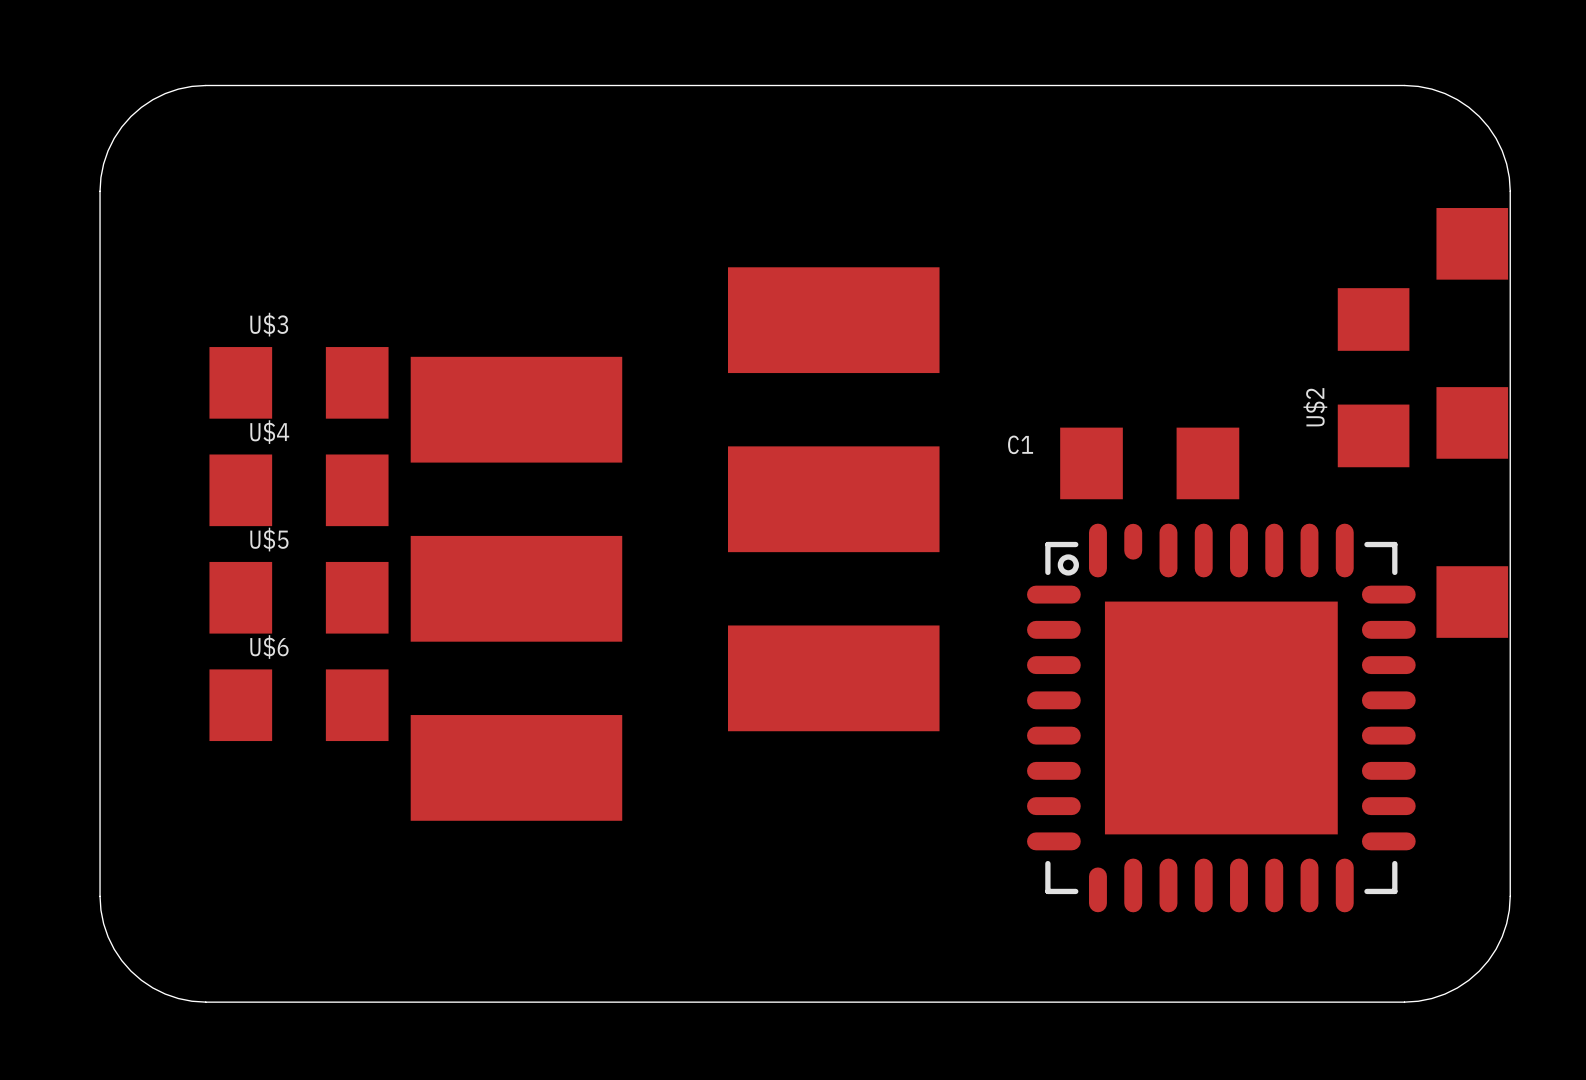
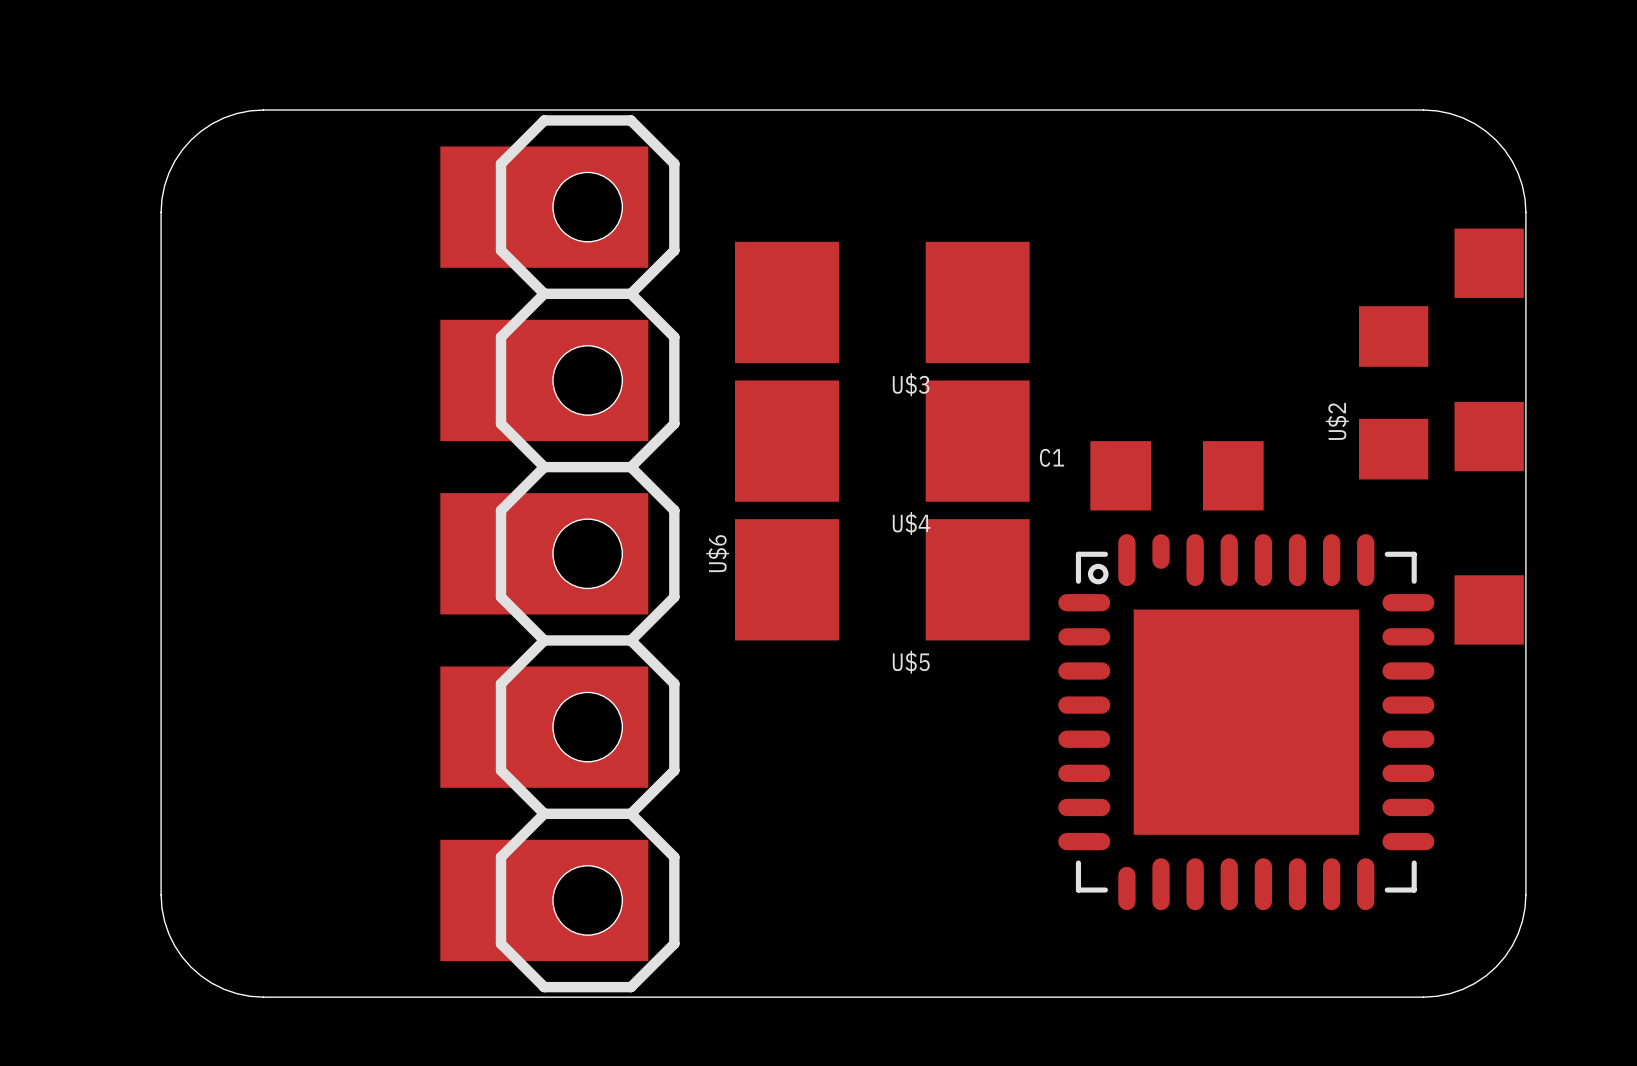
U$3 name position: U$3 (269, 324) -> U$3 (911, 384)
U$3 footprint: [209, 347, 389, 419] -> [735, 241, 1030, 364]
U$4 name position: U$4 (269, 432) -> U$4 (911, 523)
U$4 footprint: [209, 454, 389, 527] -> [735, 380, 1030, 502]
U$5 name position: U$5 (269, 539) -> U$5 (911, 662)
part: (675, 544) -> none
U$5 footprint: [209, 561, 389, 634] -> [735, 519, 1030, 641]
U$6 name position: U$6 (269, 647) -> U$6 (717, 553)
U$6 footprint: [209, 669, 389, 742] -> [440, 115, 680, 993]

